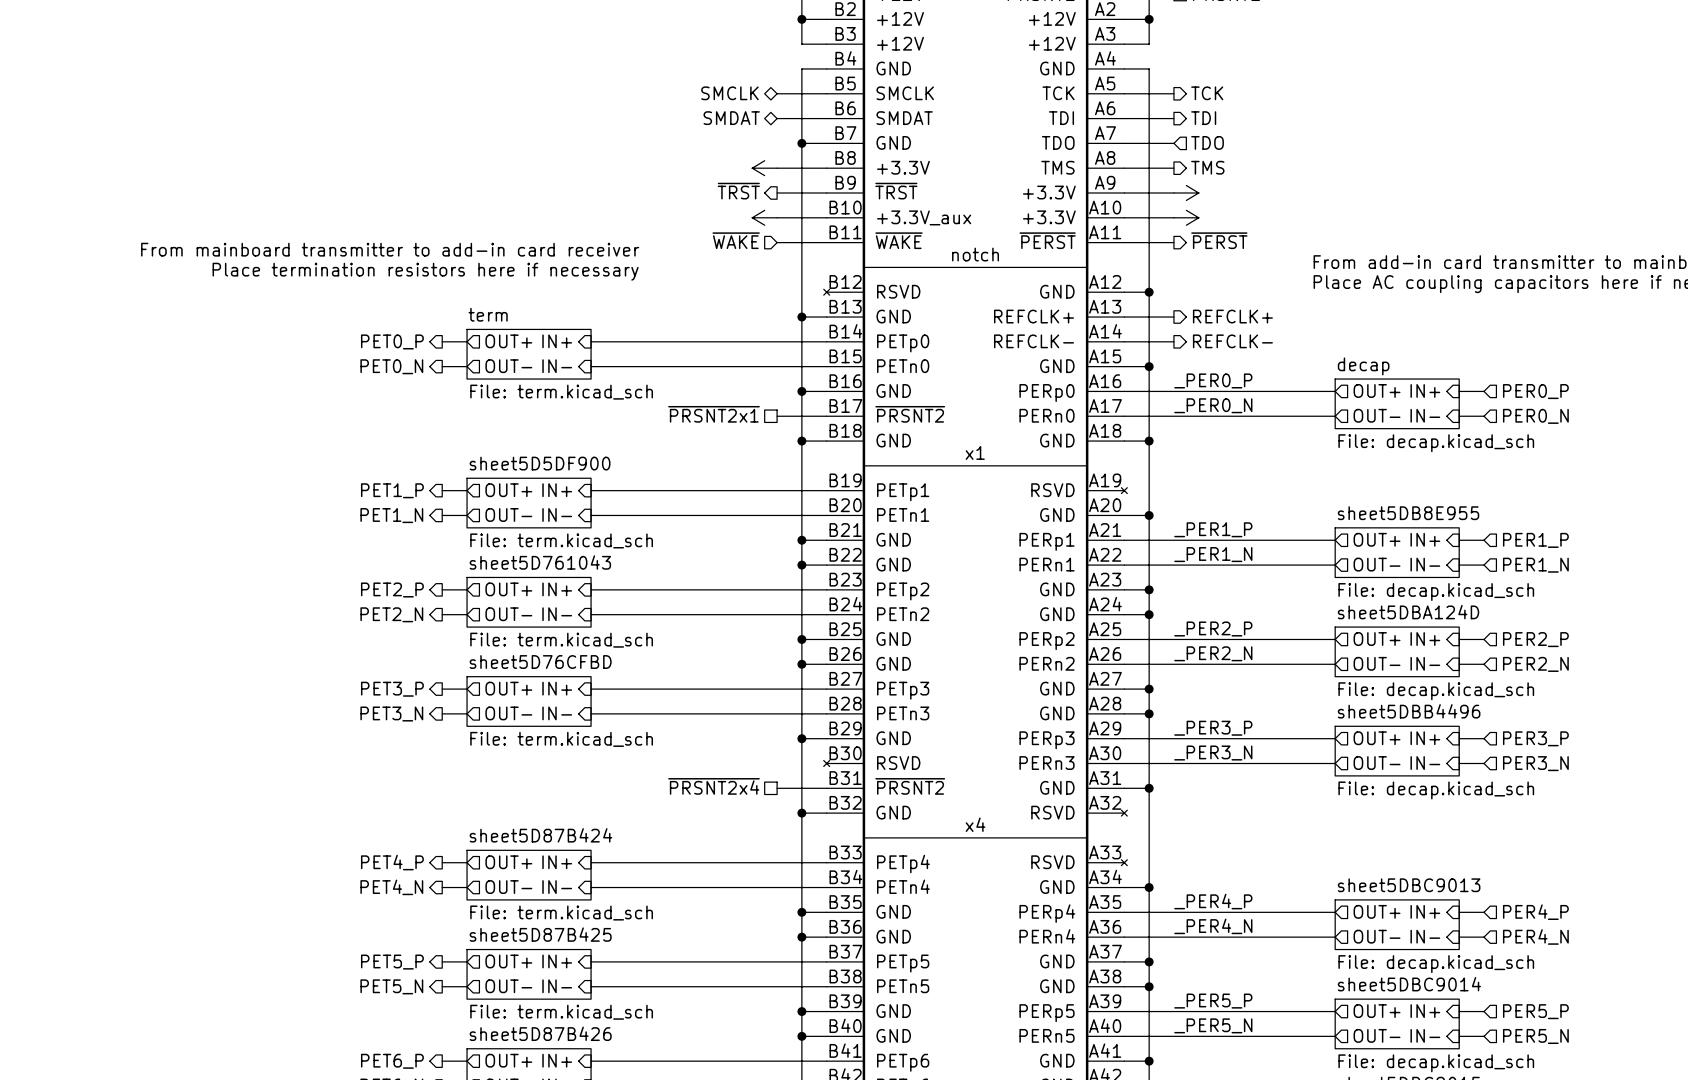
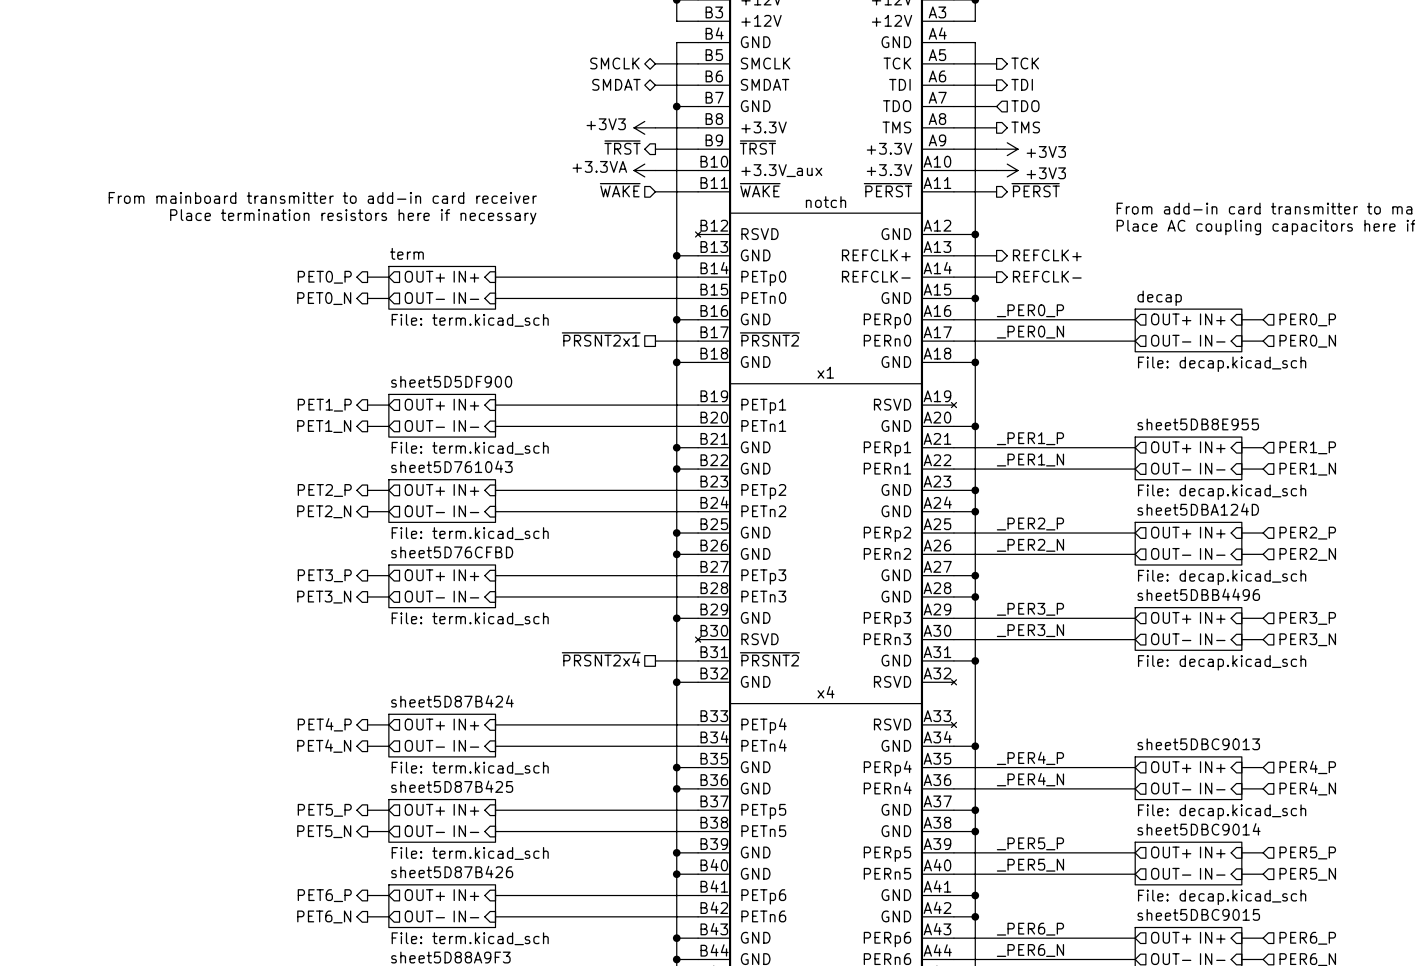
power symbol text: none -> +3V3 (606, 124)
power symbol text: none -> +3V3 (1046, 151)
power symbol text: none -> +3.3VA (599, 166)
power symbol text: none -> +3V3 (1046, 173)

